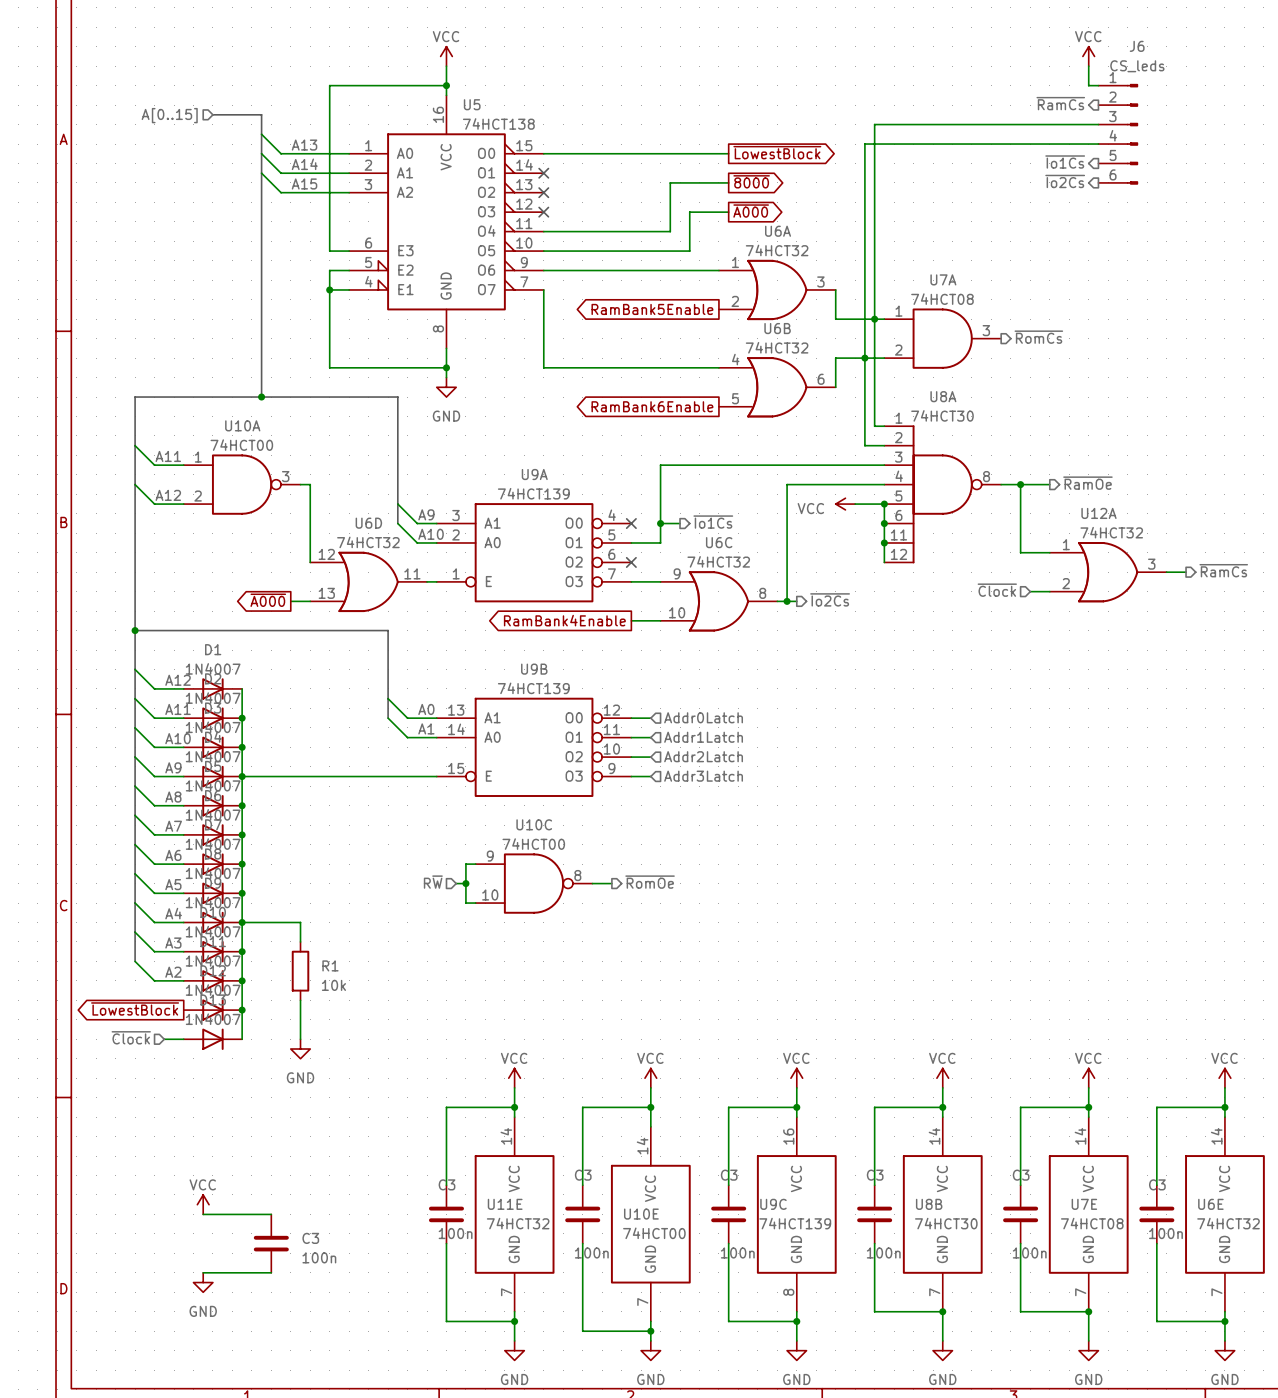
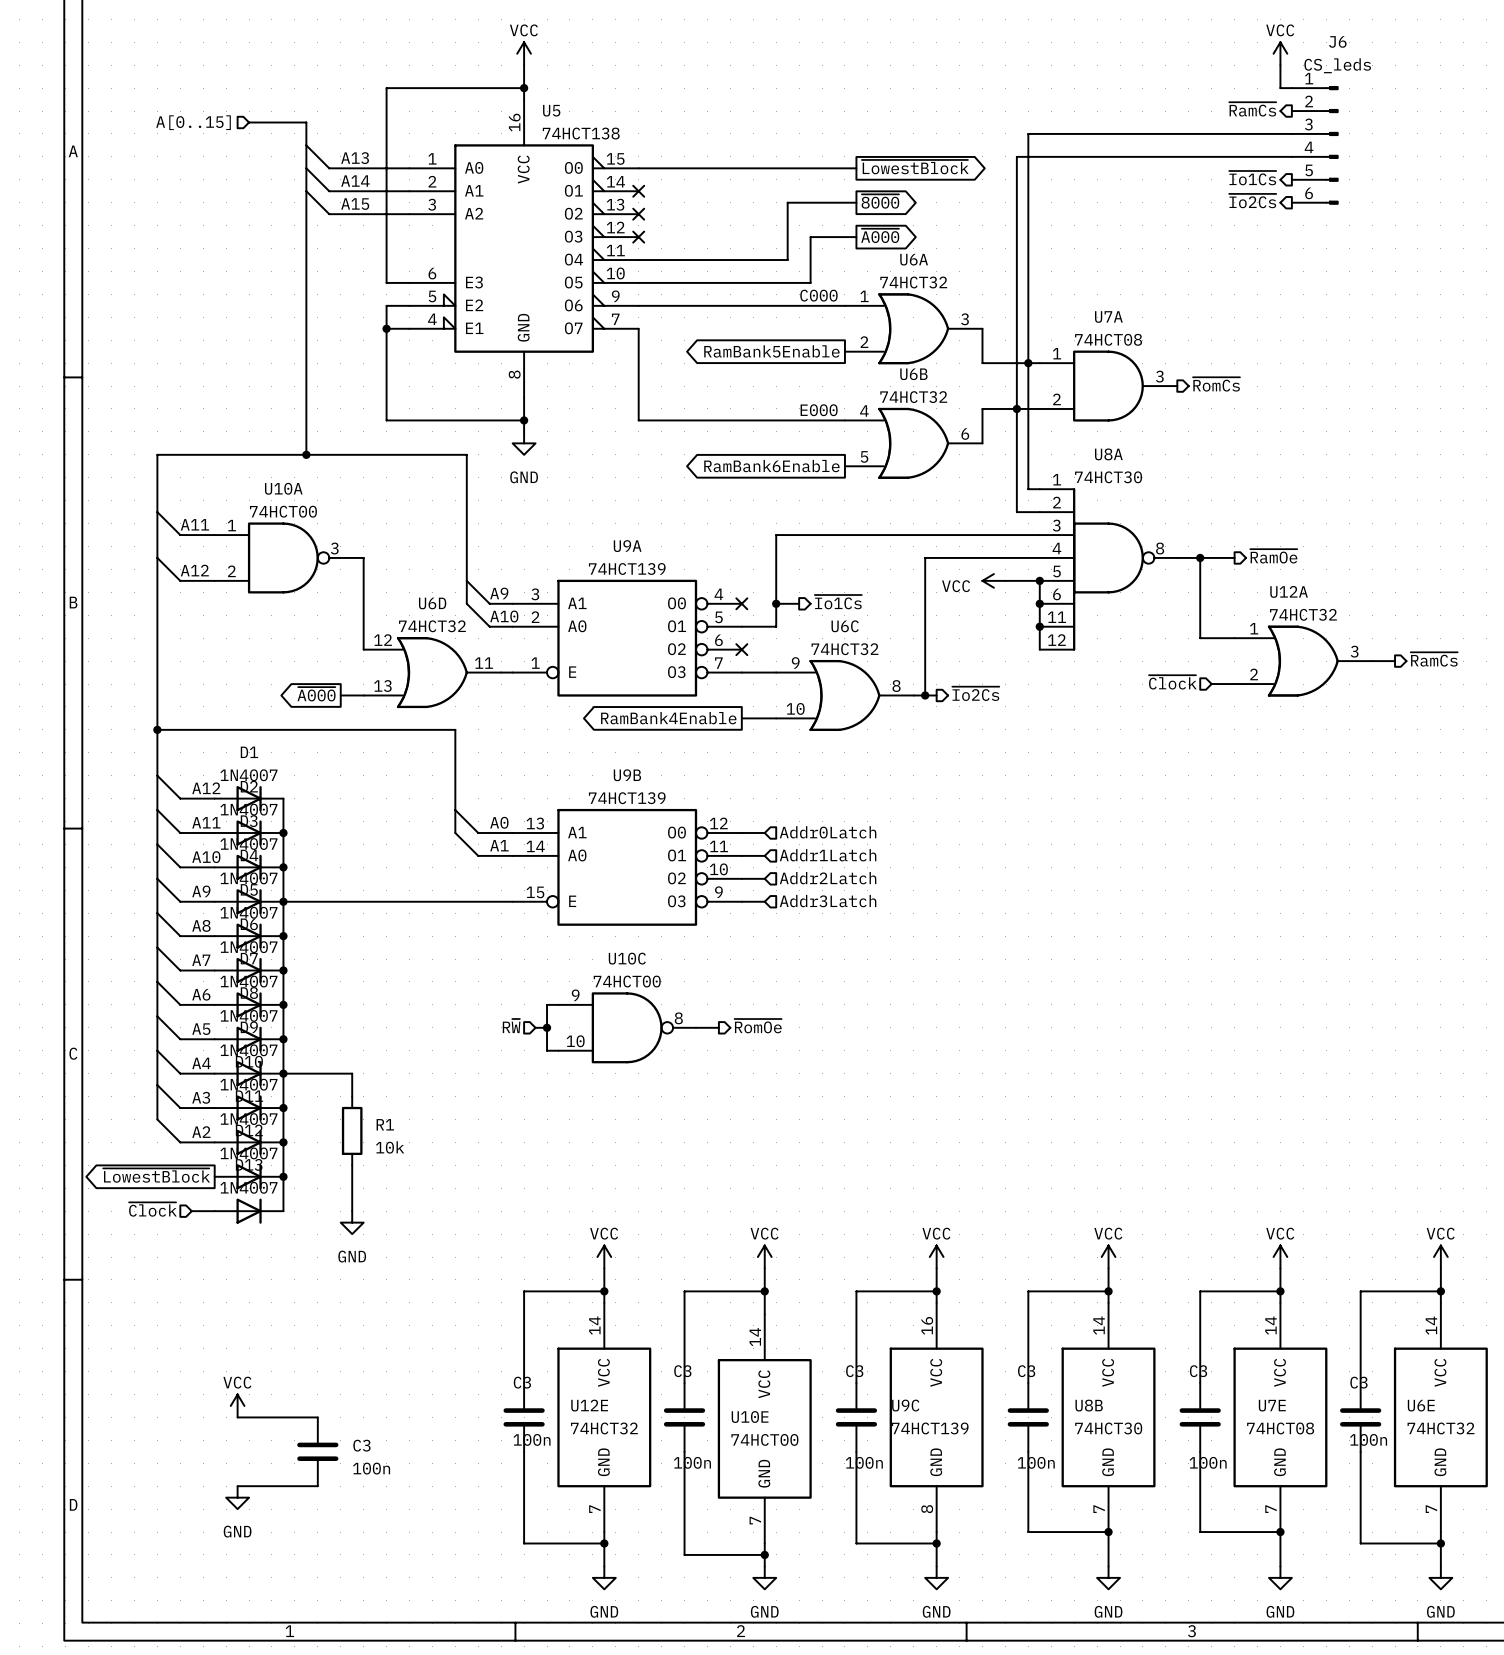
label: none -> C000 (818, 295)
label: none -> E000 (819, 410)
U11E name: U11E (505, 1204) -> U12E (589, 1405)

